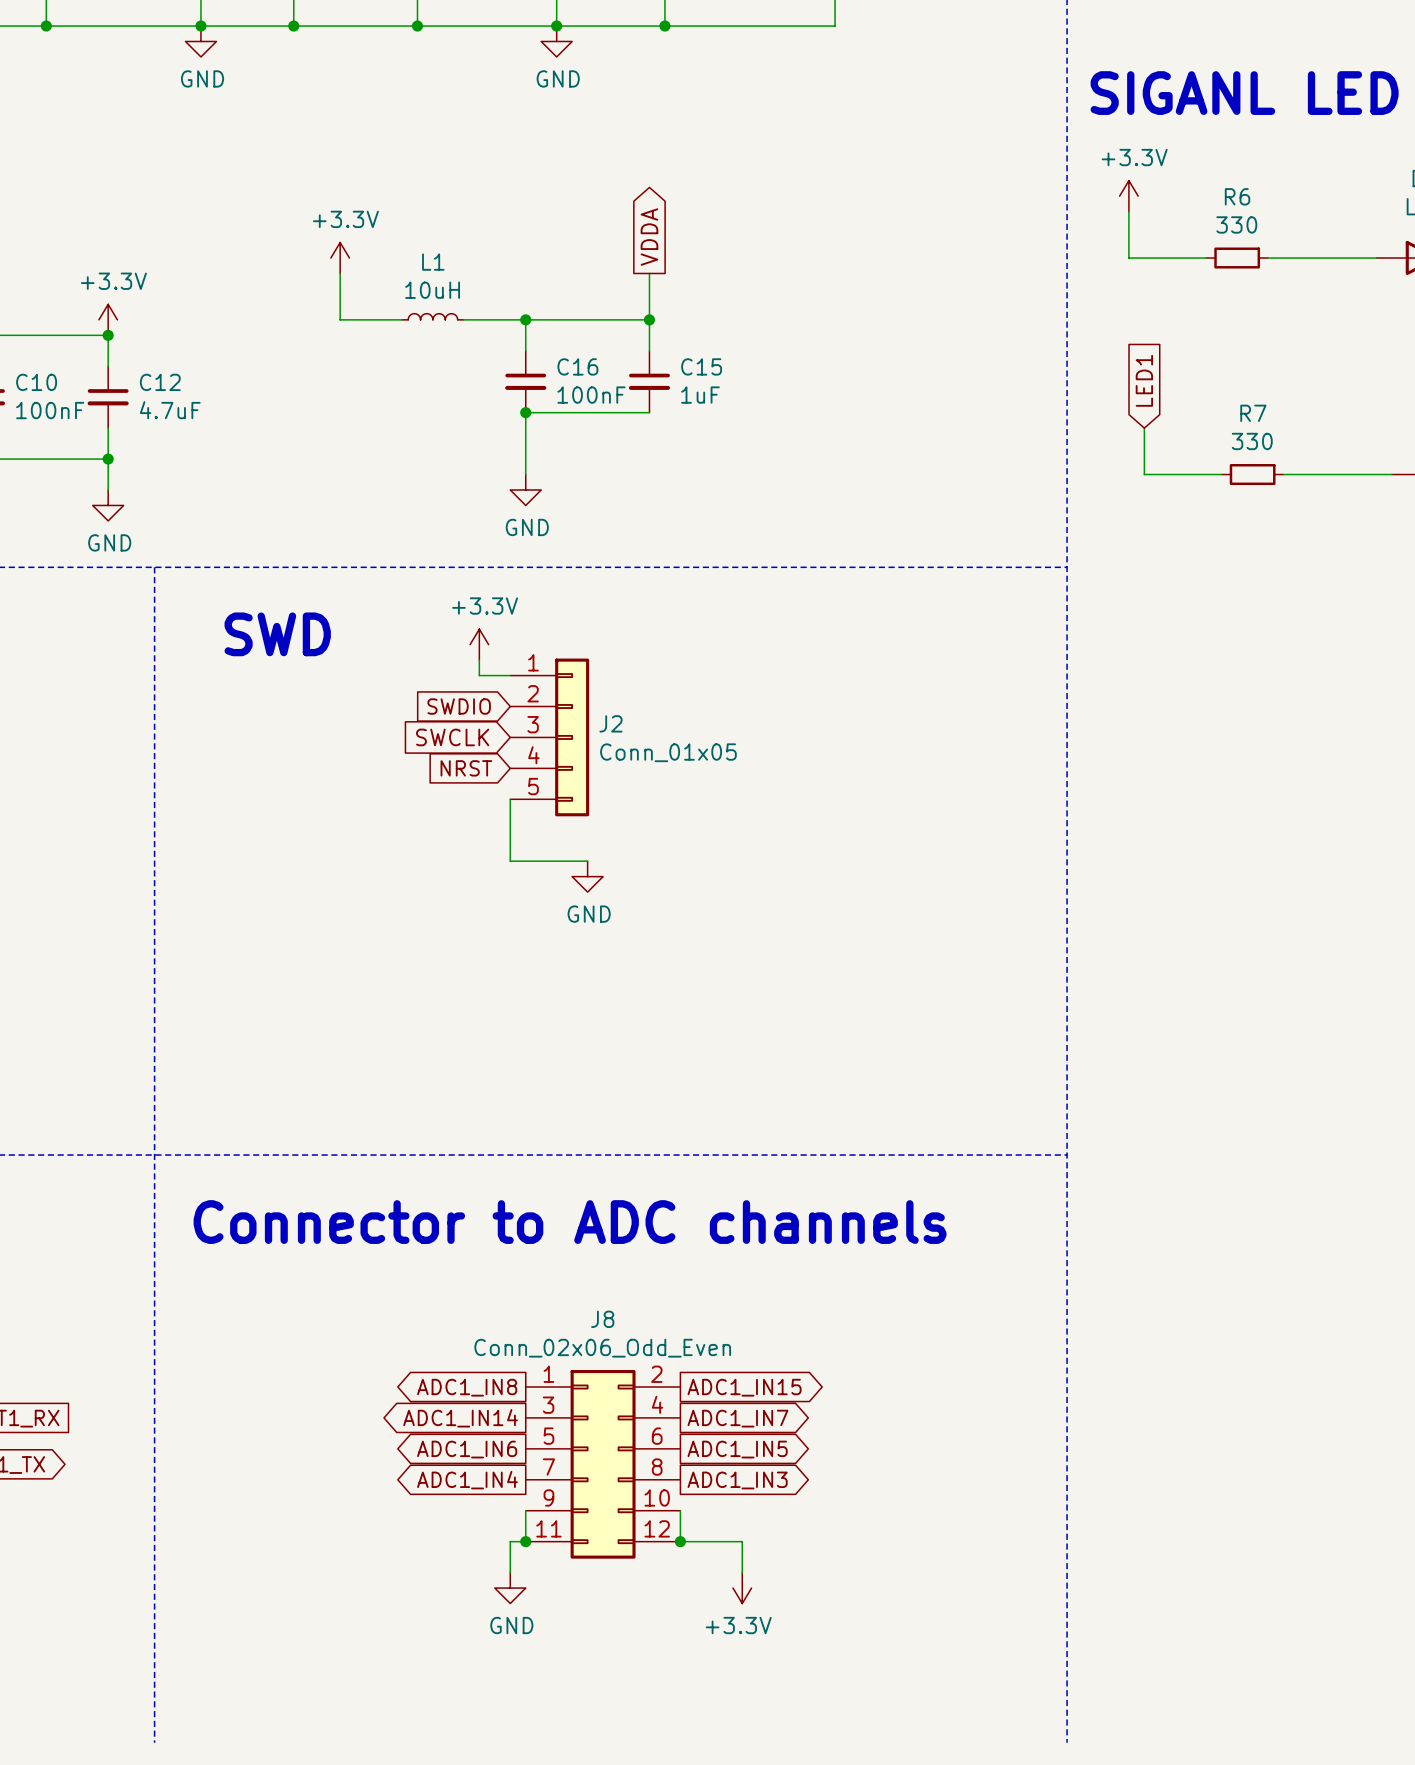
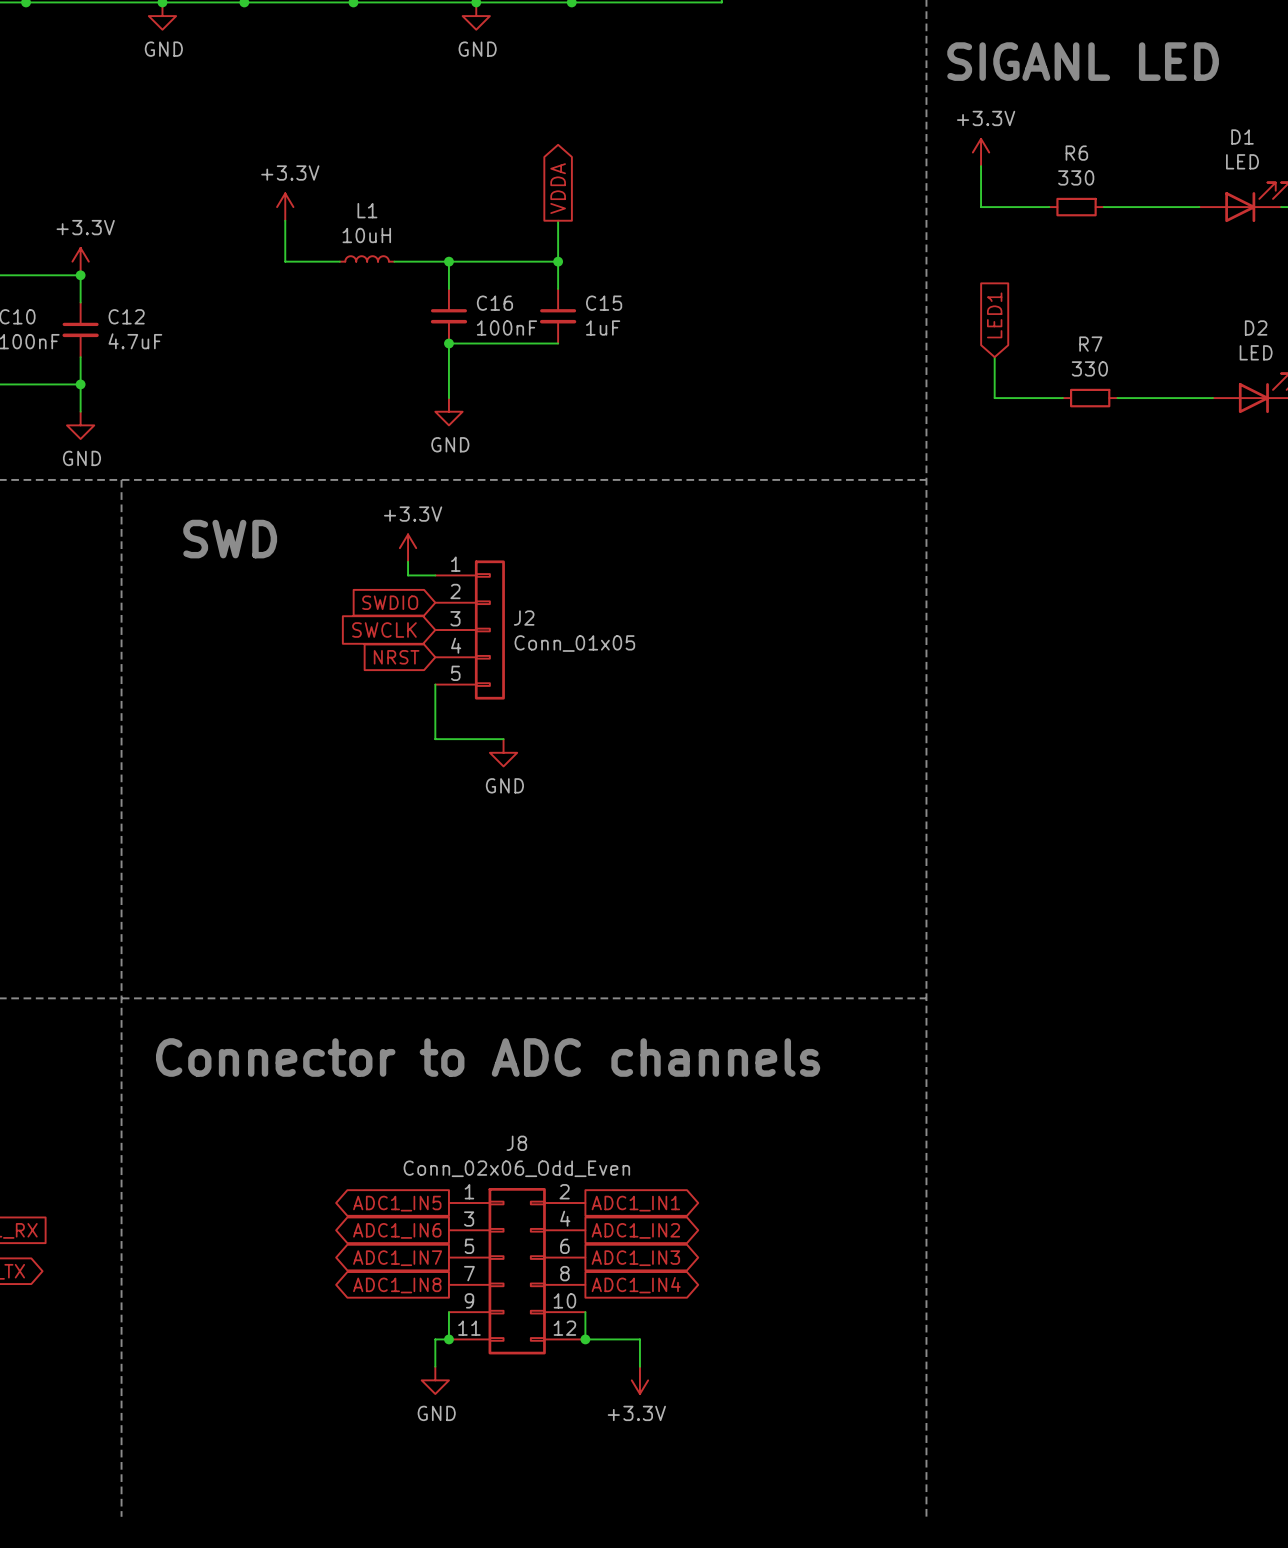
global label: ADC1_IN8 (467, 1387) -> ADC1_IN5 (397, 1203)
global label: ADC1_IN15 (744, 1387) -> ADC1_IN1 (635, 1203)
global label: ADC1_IN14 (460, 1418) -> ADC1_IN6 (397, 1230)
global label: ADC1_IN7 (737, 1418) -> ADC1_IN2 (635, 1230)
global label: ADC1_IN6 (467, 1449) -> ADC1_IN7 (397, 1258)
global label: ADC1_IN5 (737, 1449) -> ADC1_IN3 (635, 1258)
global label: ADC1_IN4 (467, 1480) -> ADC1_IN8 (397, 1285)
global label: ADC1_IN3 (737, 1480) -> ADC1_IN4 (636, 1285)

